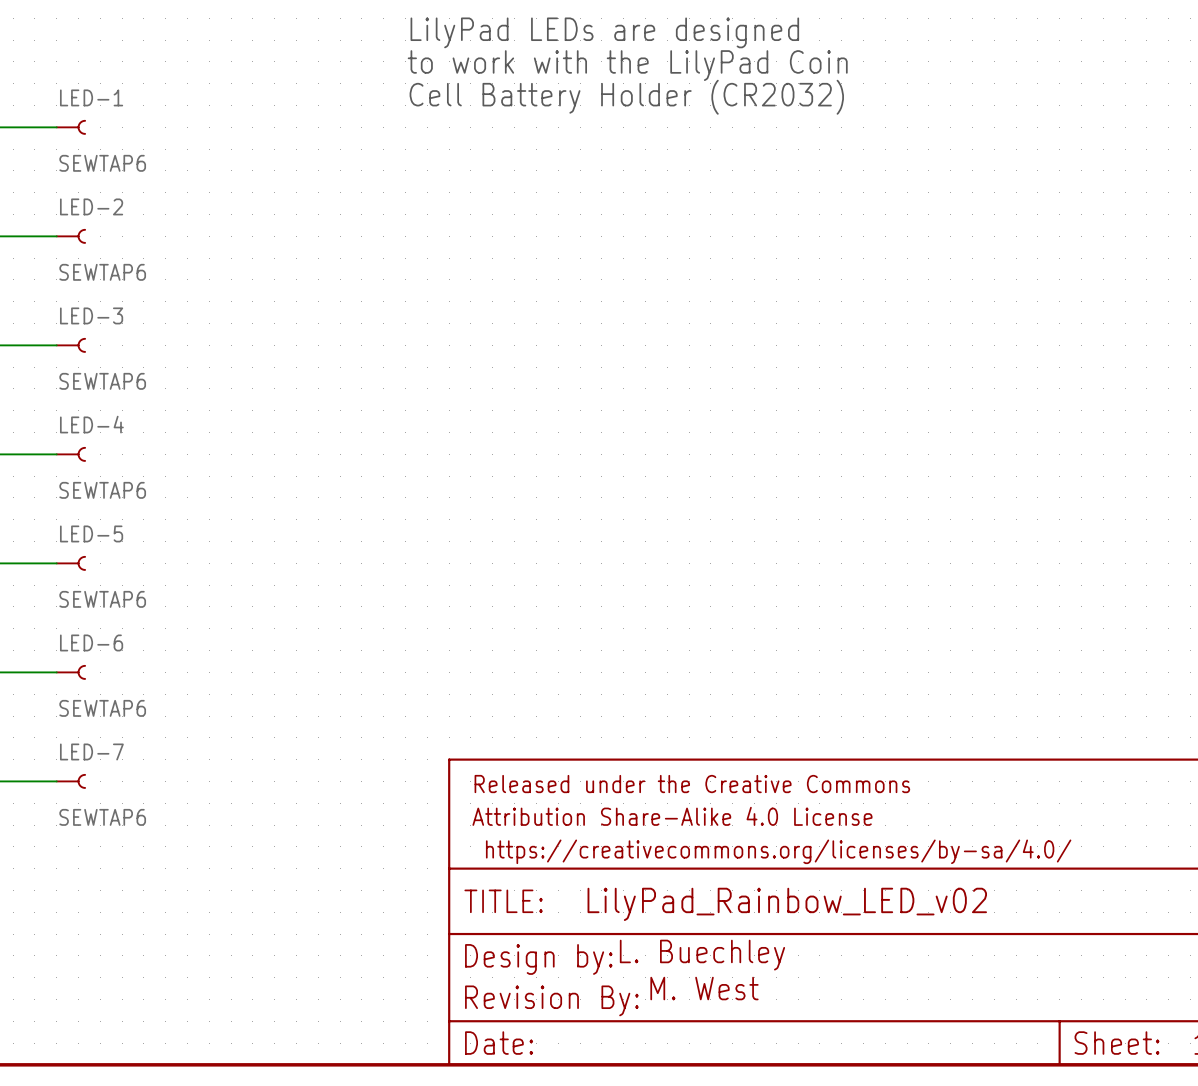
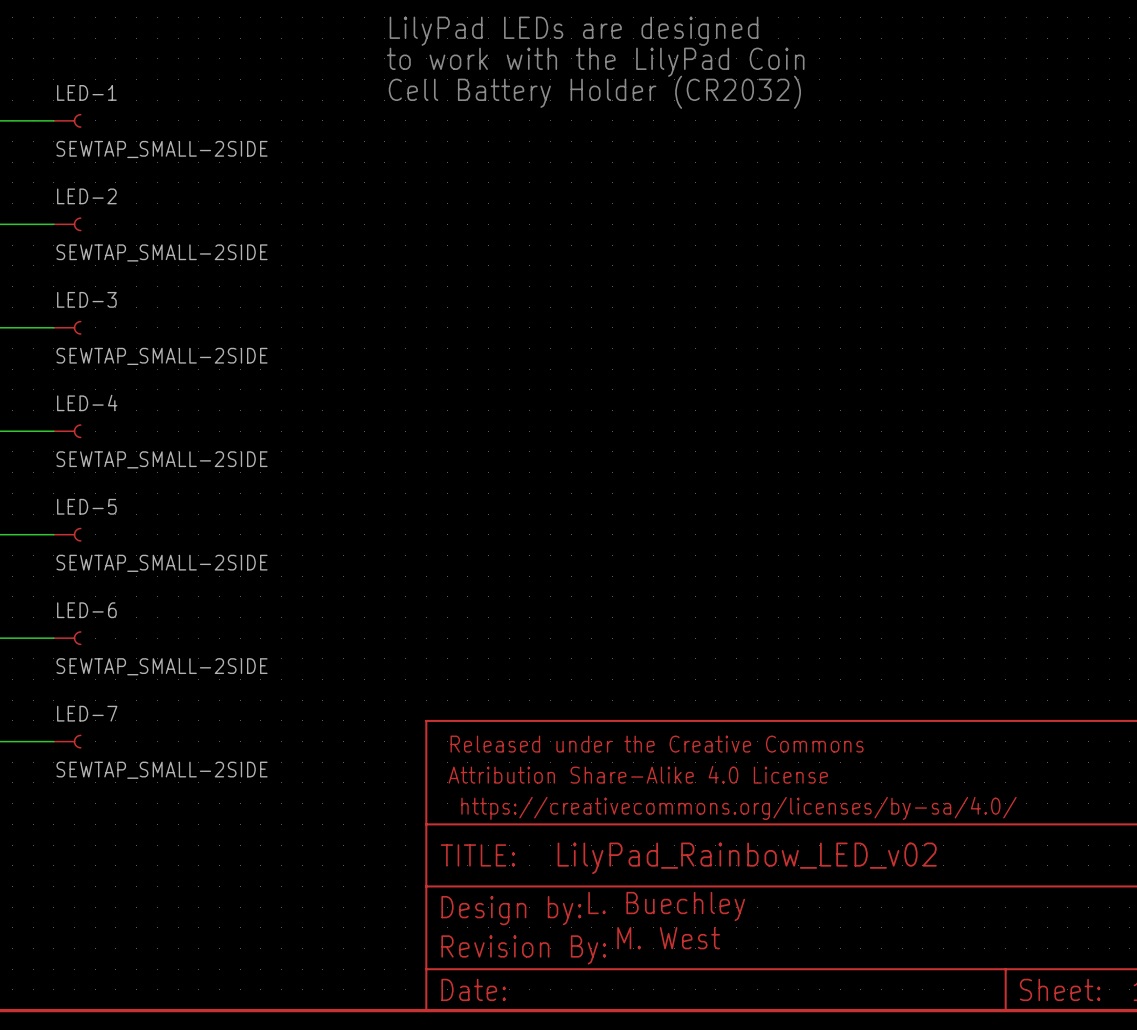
LED-1 value: SEWTAP6 (102, 163) -> SEWTAP_SMALL-2SIDE (162, 149)
LED-2 value: SEWTAP6 (102, 272) -> SEWTAP_SMALL-2SIDE (162, 252)
LED-3 value: SEWTAP6 (102, 381) -> SEWTAP_SMALL-2SIDE (162, 356)
LED-4 value: SEWTAP6 (102, 490) -> SEWTAP_SMALL-2SIDE (162, 459)
LED-5 value: SEWTAP6 (102, 599) -> SEWTAP_SMALL-2SIDE (162, 563)
LED-6 value: SEWTAP6 (102, 708) -> SEWTAP_SMALL-2SIDE (162, 666)
LED-7 value: SEWTAP6 (102, 817) -> SEWTAP_SMALL-2SIDE (162, 770)

